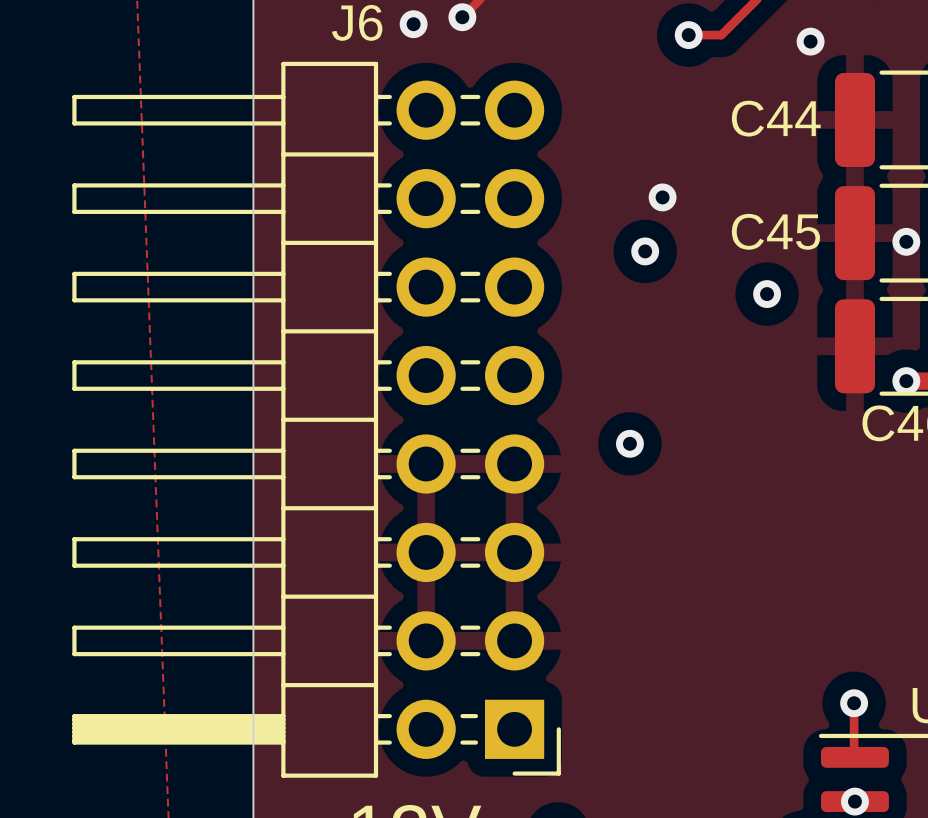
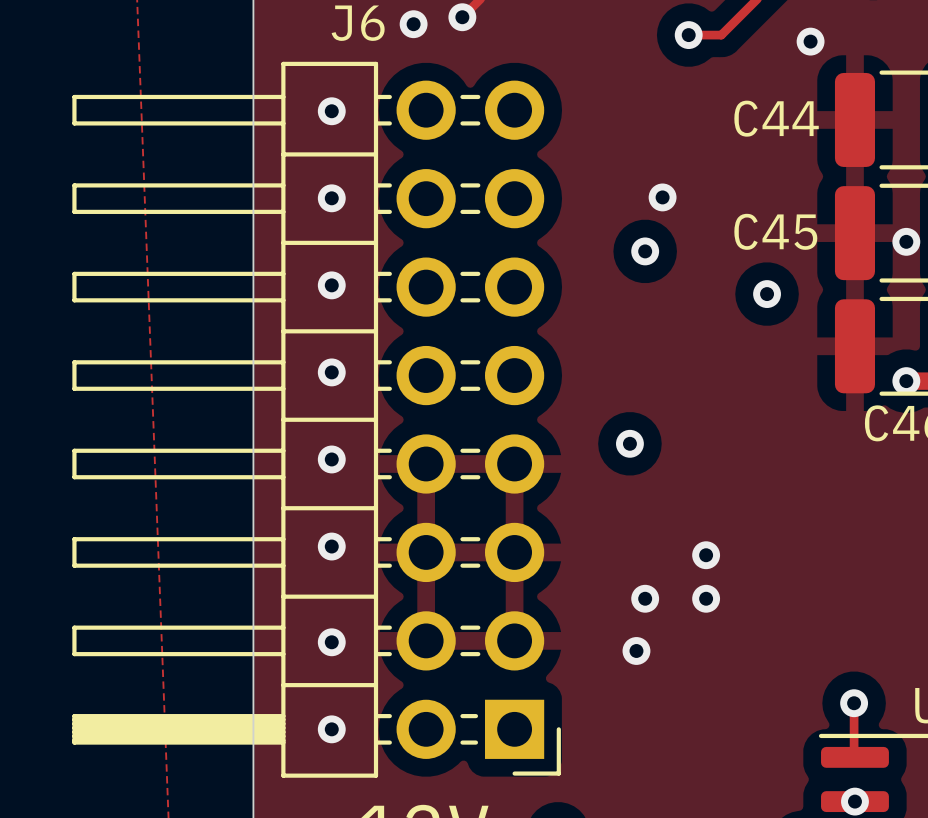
via: none -> (331, 111)
via: none -> (331, 198)
via: none -> (331, 285)
via: none -> (331, 372)
via: none -> (331, 459)
via: none -> (331, 546)
via: none -> (706, 555)
via: none -> (645, 598)
via: none -> (706, 598)
via: none -> (331, 642)
via: none -> (636, 650)
via: none -> (331, 729)

